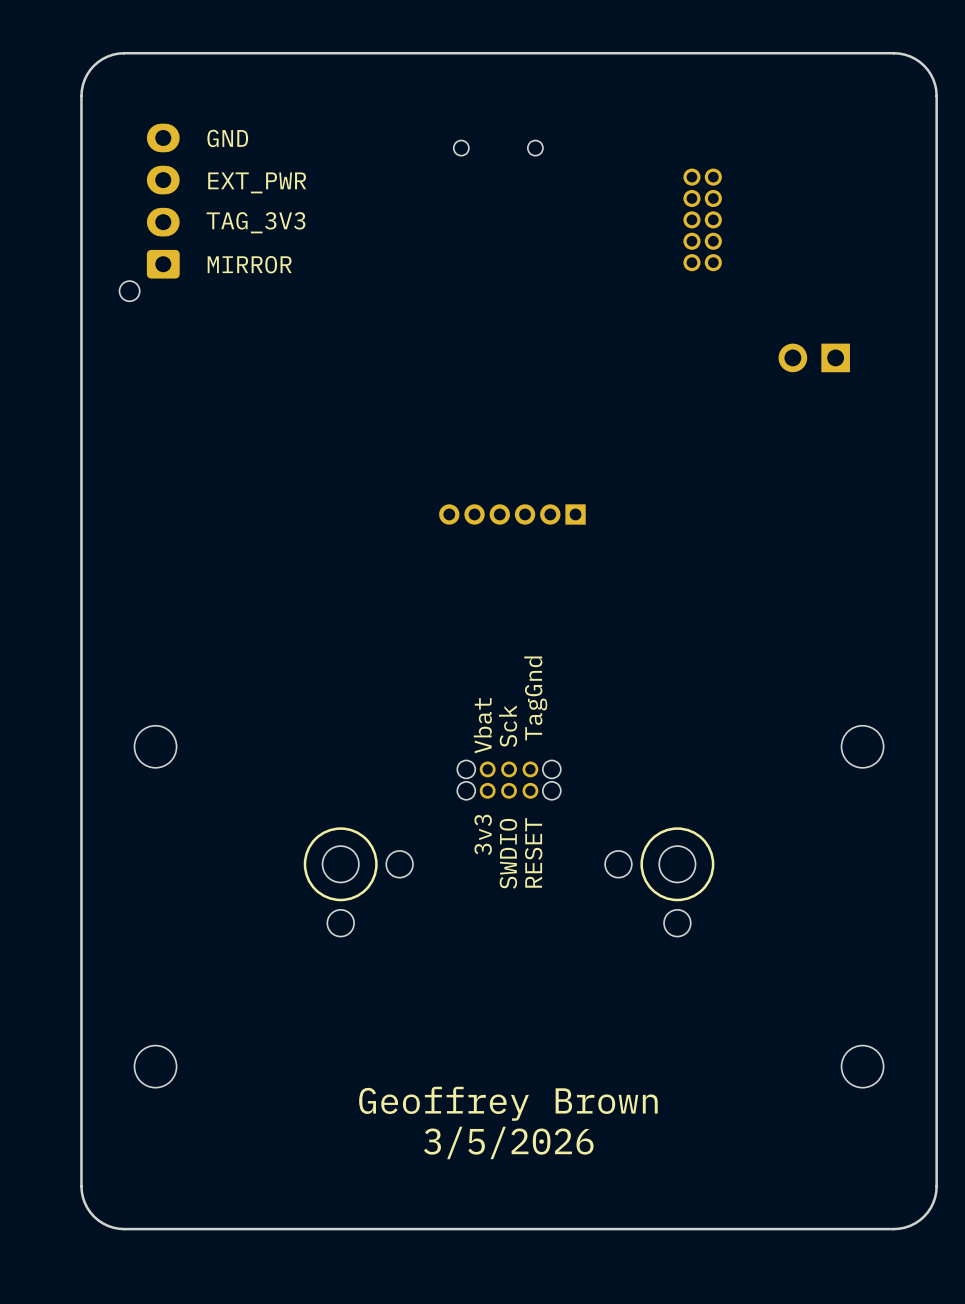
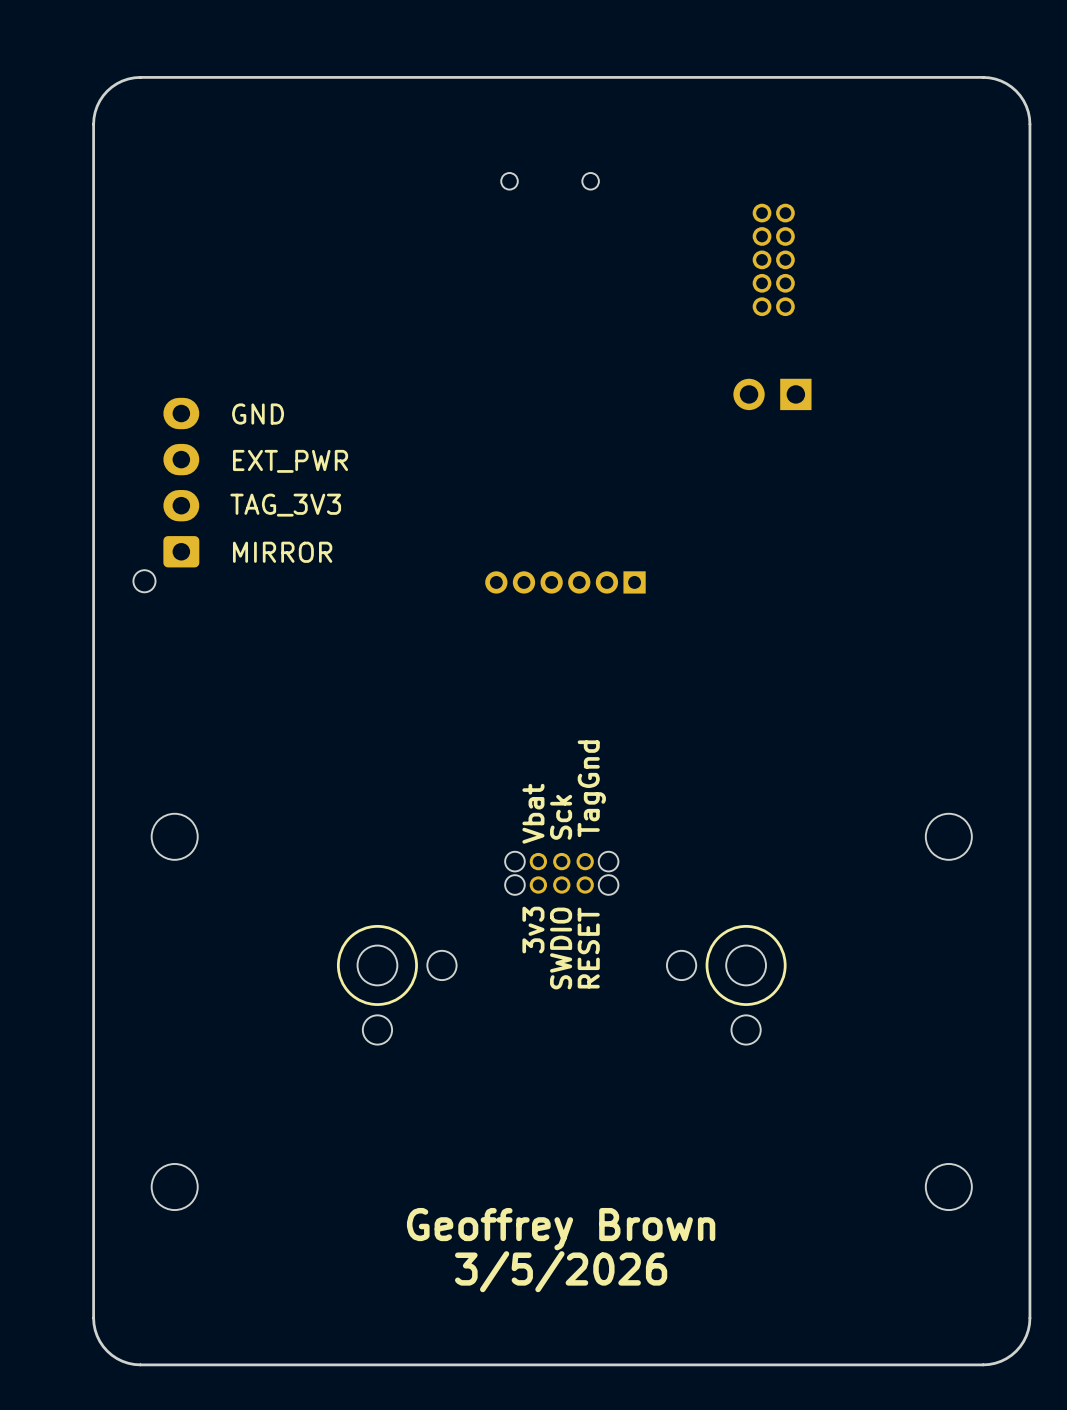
text position: GND (227, 138) -> GND (258, 414)
text position: EXT_PWR (257, 182) -> EXT_PWR (290, 461)
part position: (149, 212) -> (166, 495)
text position: TAG_3V3 (256, 222) -> TAG_3V3 (285, 505)
text position: MIRROR (249, 264) -> MIRROR (282, 552)
part position: (814, 357) -> (772, 394)

